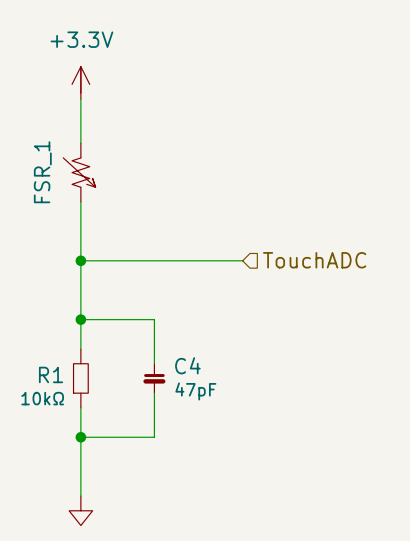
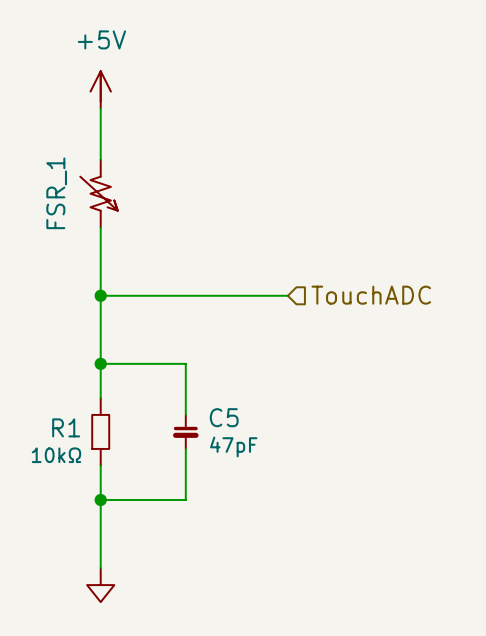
power symbol: +3.3V (80, 82) -> +5V (100, 89)
C4 name: C4 (187, 365) -> C5 (224, 417)

